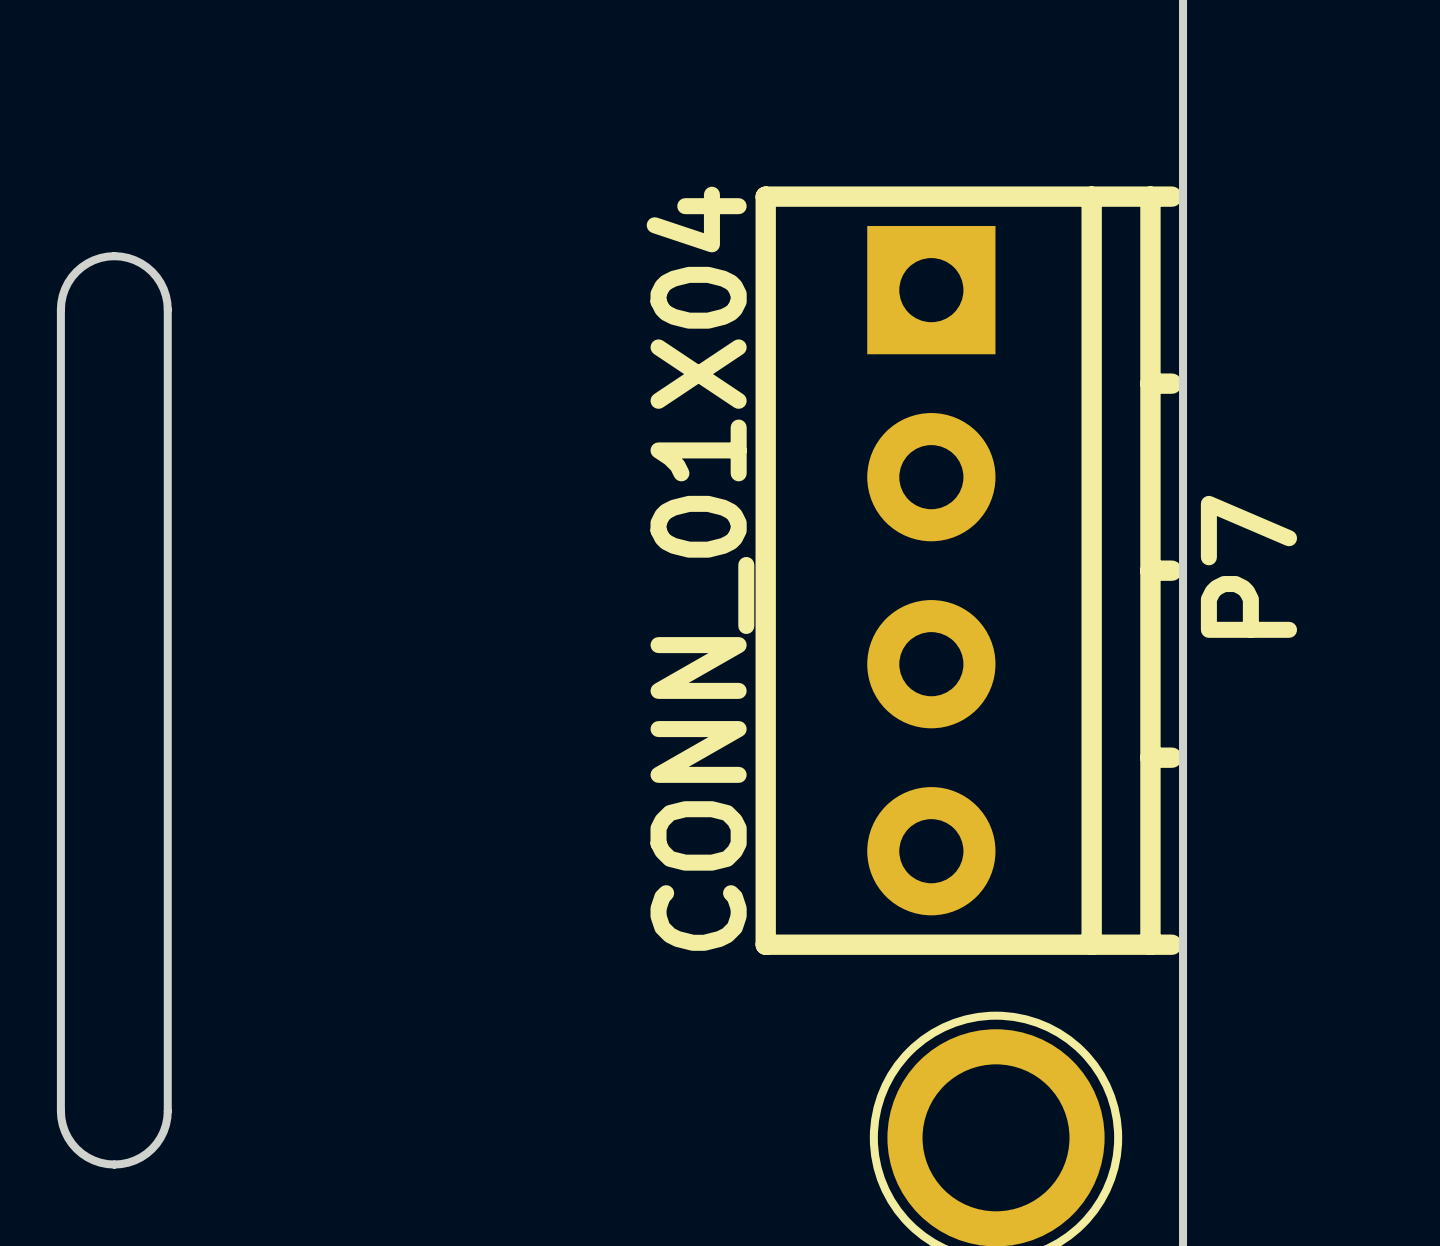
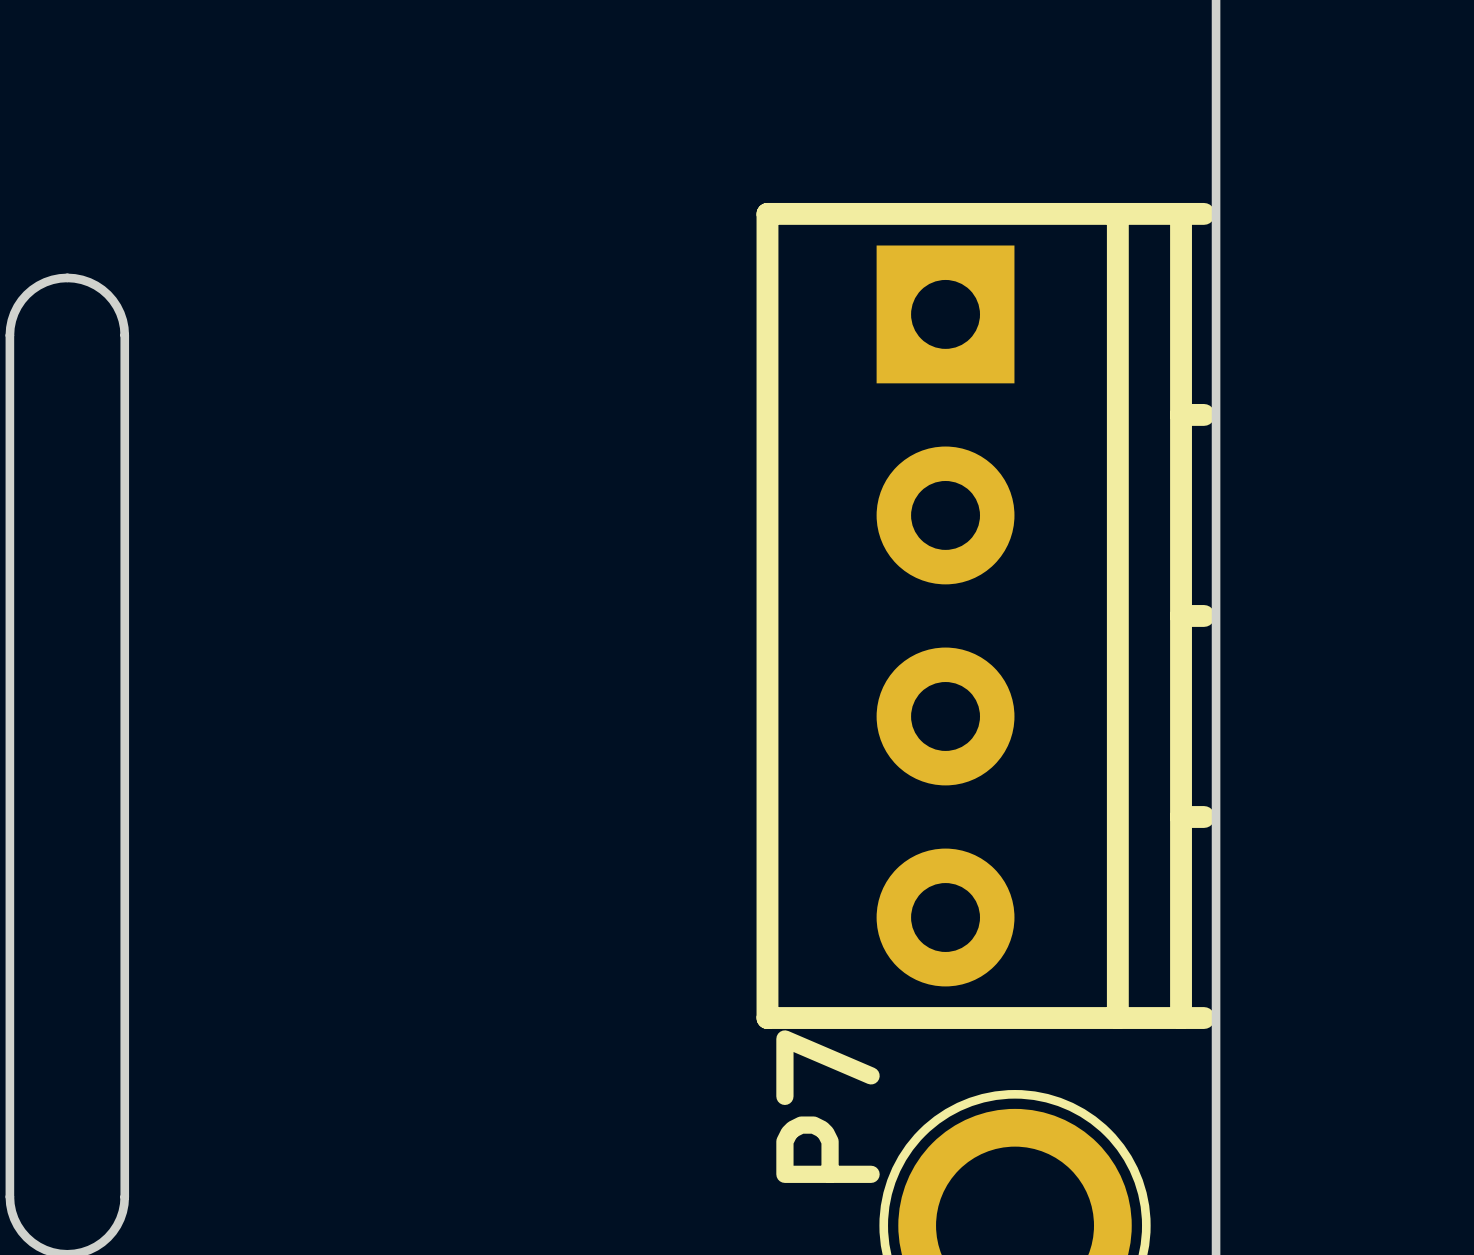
P7 name position: P7 (1248, 566) -> P7 (828, 1106)
P7 value: CONN_01X04 (700, 568) -> none

